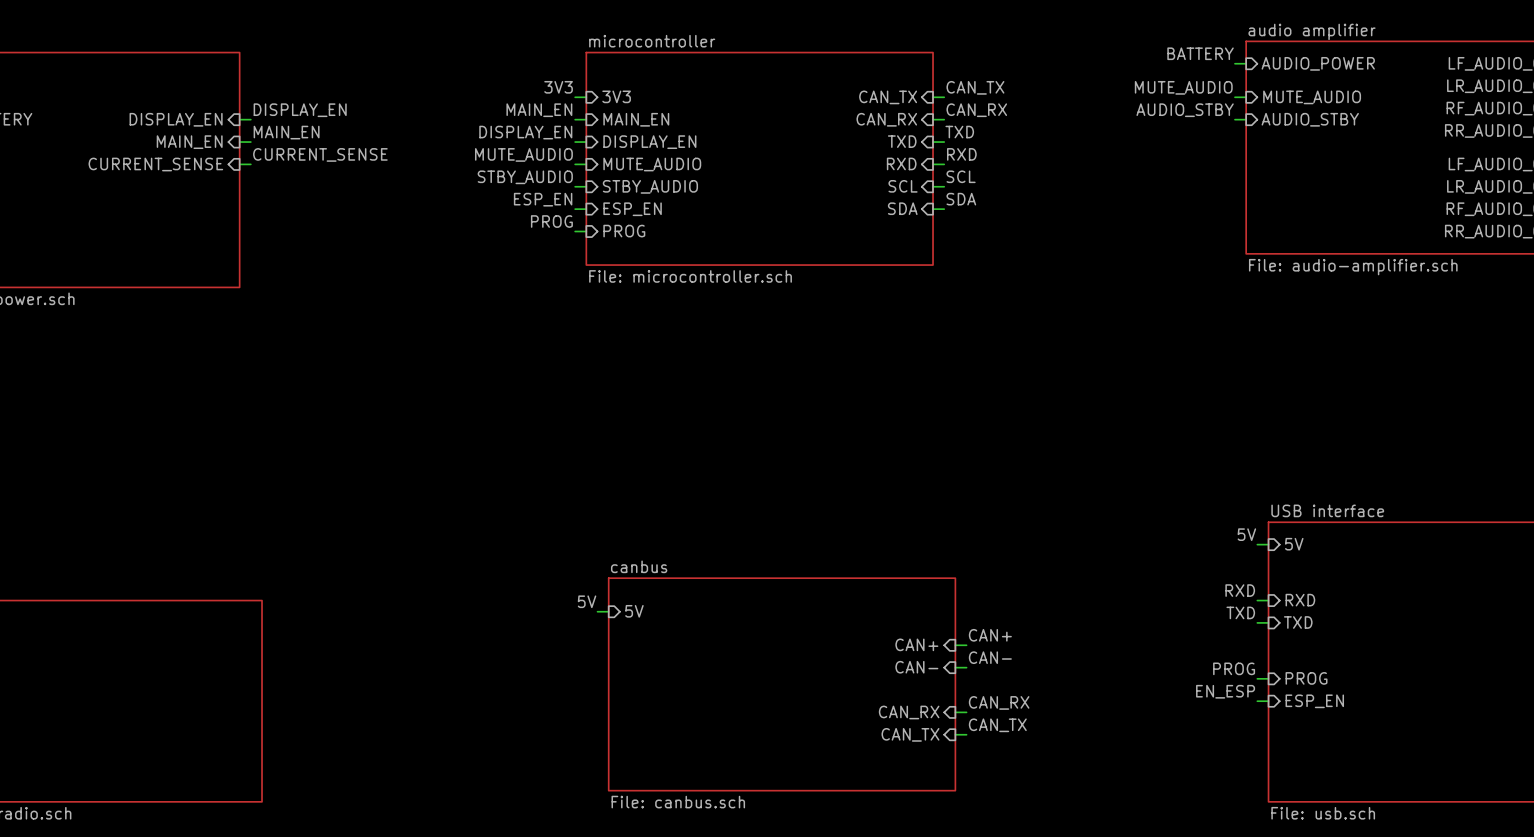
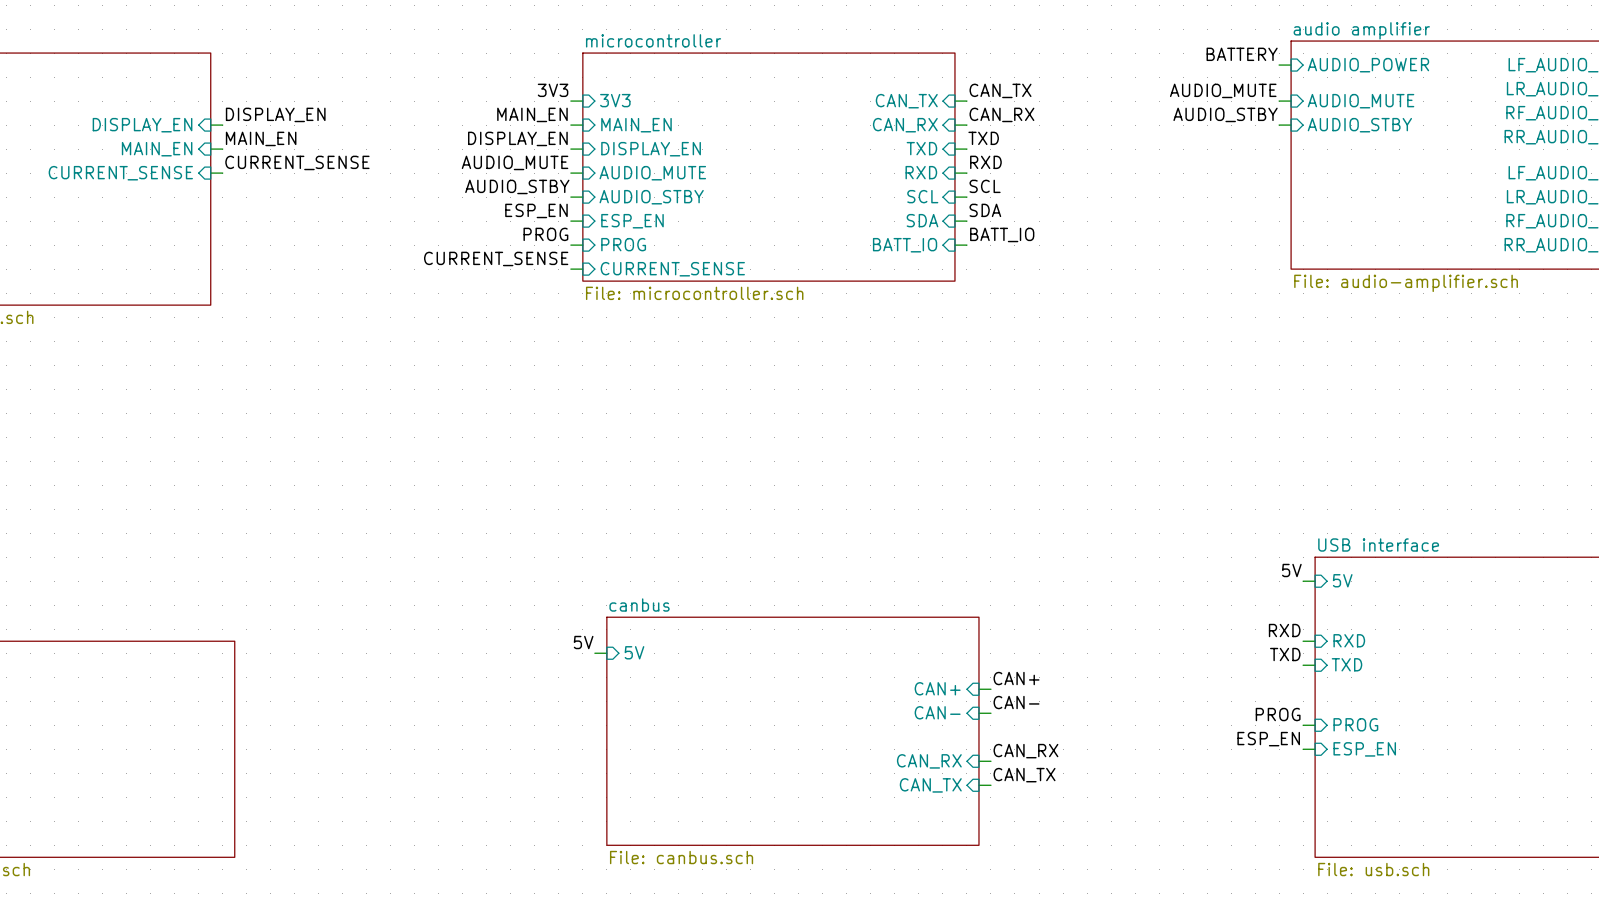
label: MUTE_AUDIO (1183, 87) -> AUDIO_MUTE (1223, 90)
sheet pin: MUTE_AUDIO (1312, 97) -> AUDIO_MUTE (1361, 101)
label: MUTE_AUDIO (523, 154) -> AUDIO_MUTE (515, 162)
sheet pin: MUTE_AUDIO (652, 164) -> AUDIO_MUTE (652, 173)
label: STBY_AUDIO (525, 177) -> AUDIO_STBY (517, 186)
sheet pin: STBY_AUDIO (650, 186) -> AUDIO_STBY (651, 197)
label: none -> BATT_IO (1002, 234)
sheet pin: none -> BATT_IO (905, 245)
wire: none -> (954, 245) (966, 245)
label: none -> CURRENT_SENSE (496, 258)
wire: none -> (570, 269) (582, 269)
sheet pin: none -> CURRENT_SENSE (672, 269)
label: EN_ESP (1225, 691) -> ESP_EN (1268, 739)

